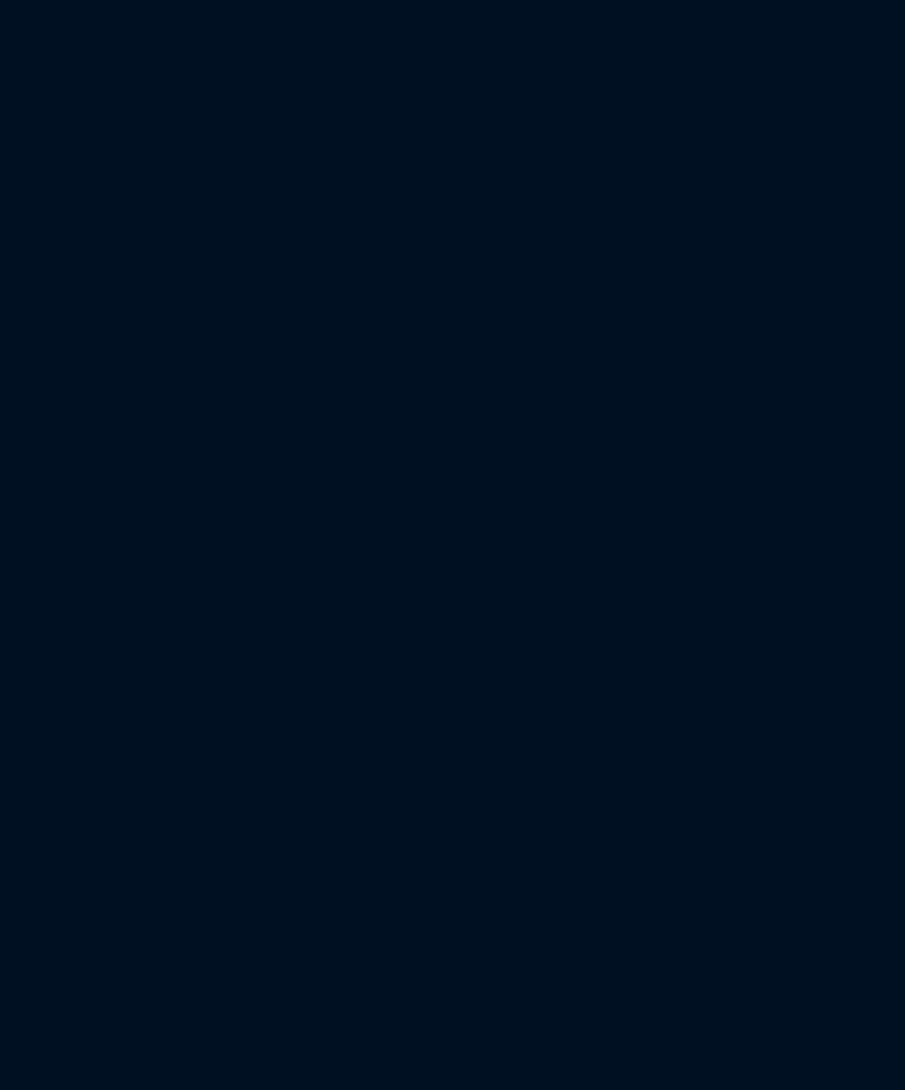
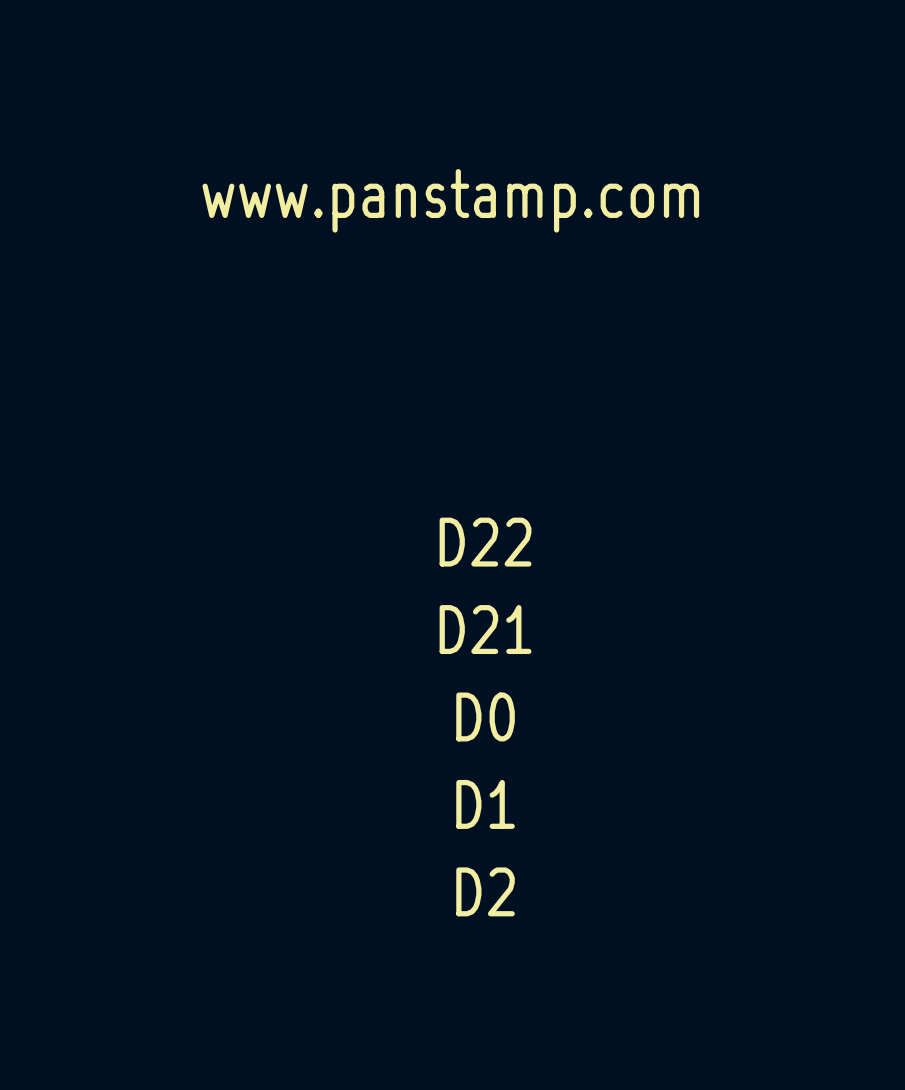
text: none -> www.panstamp.com (450, 200)
text: none -> D22 (485, 542)
text: none -> D21 (485, 629)
text: none -> D0 (485, 716)
text: none -> D1 (485, 804)
text: none -> D2 (485, 891)

